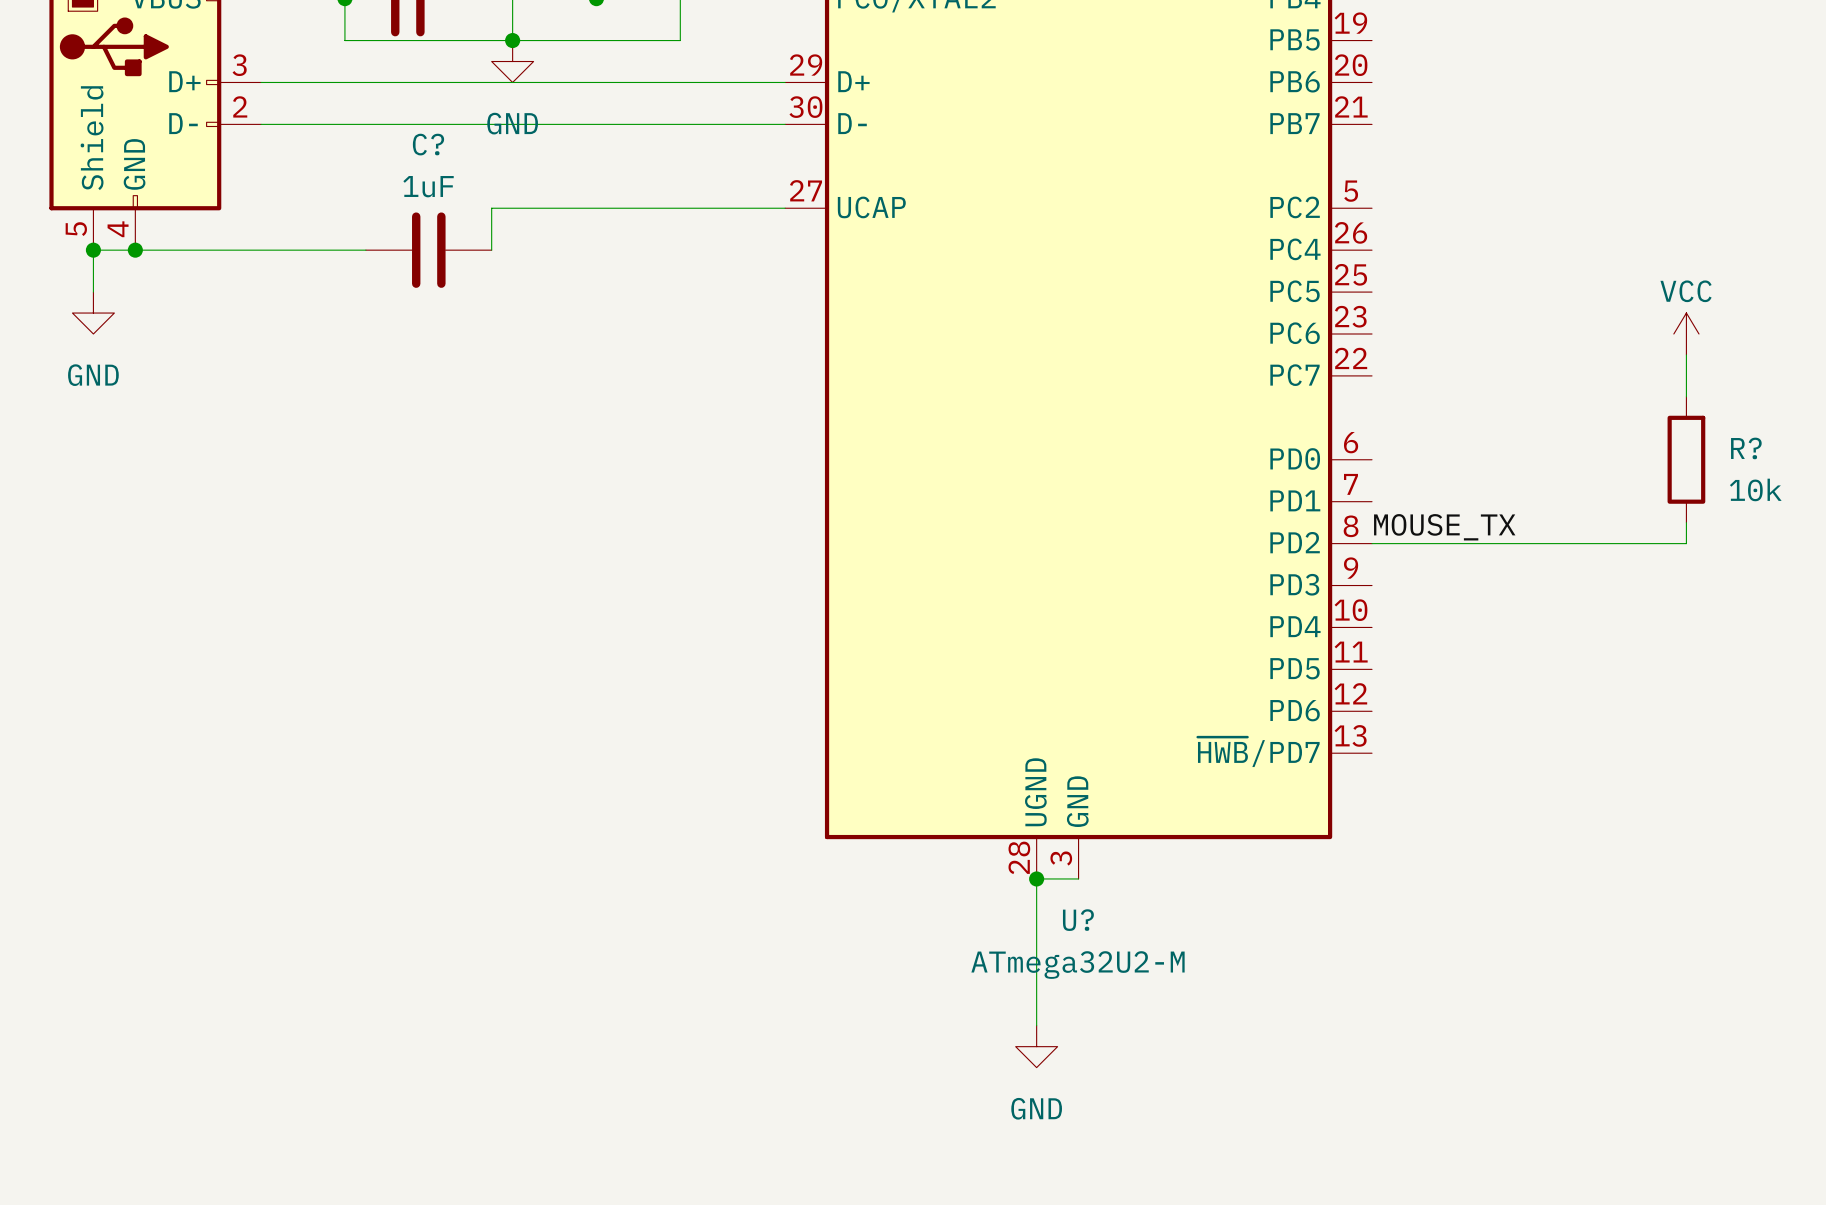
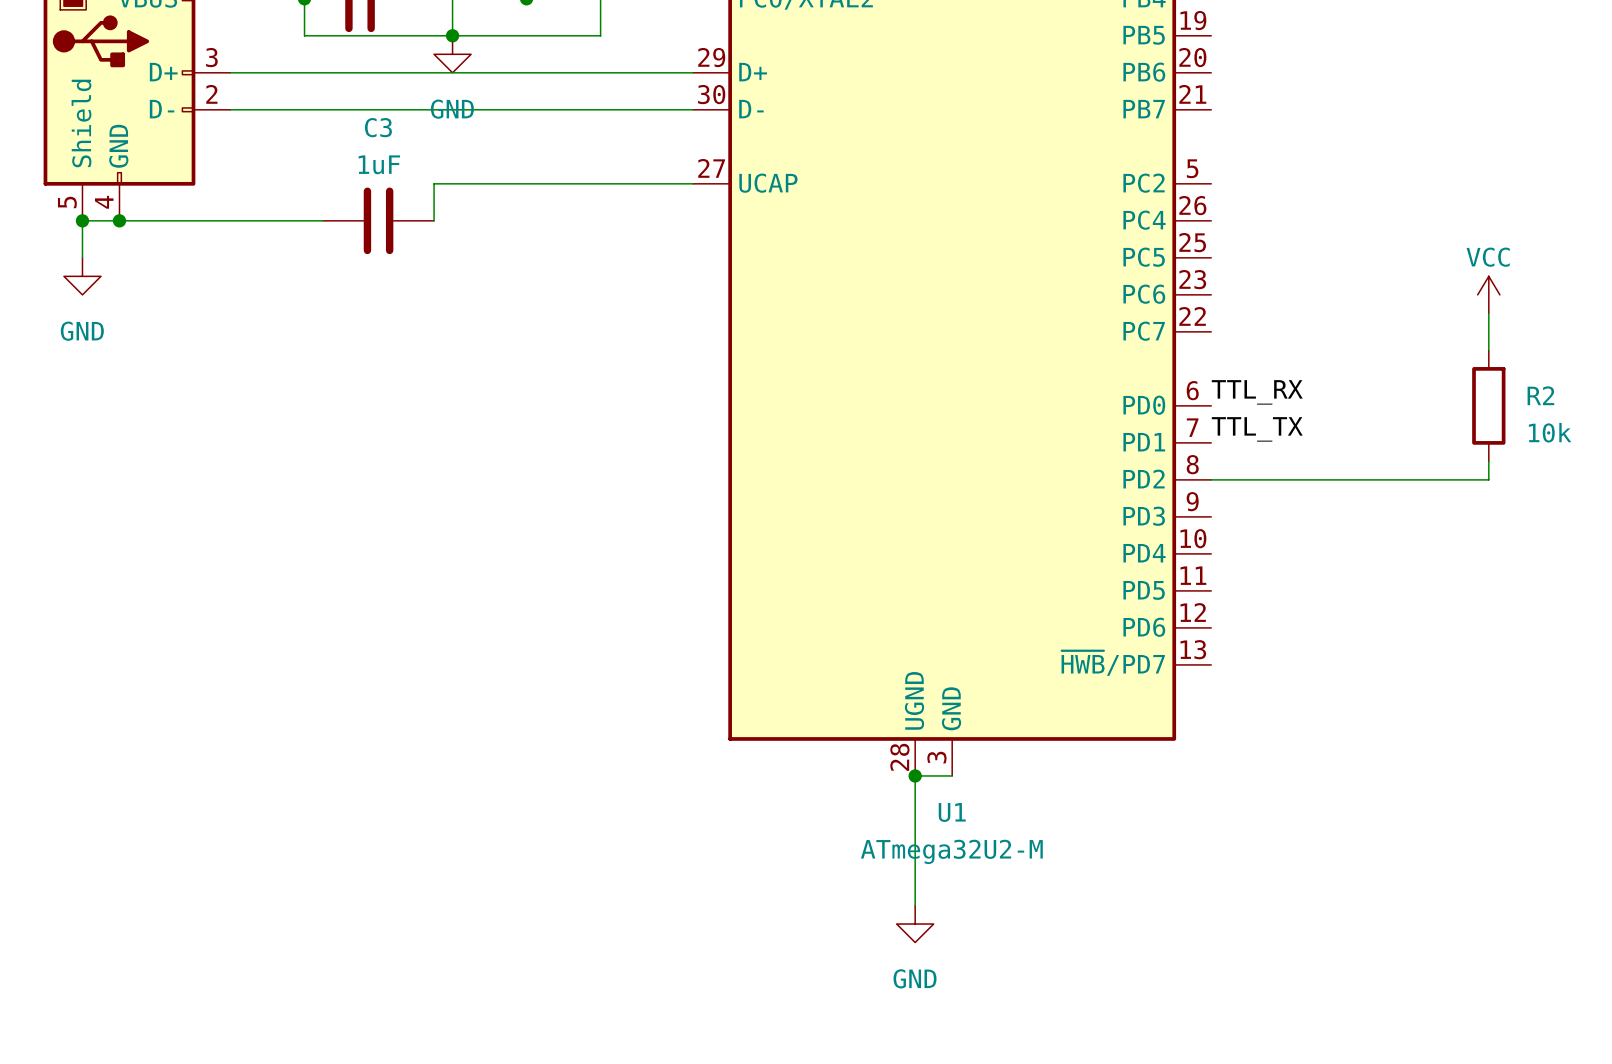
C? name: C? (428, 144) -> C3 (378, 127)
label: none -> TTL_RX (1257, 392)
R? name: R? (1746, 448) -> R2 (1540, 395)
label: none -> TTL_TX (1257, 429)
label: MOUSE_TX (1444, 527) -> none
U? name: U? (1078, 920) -> U1 (952, 812)

